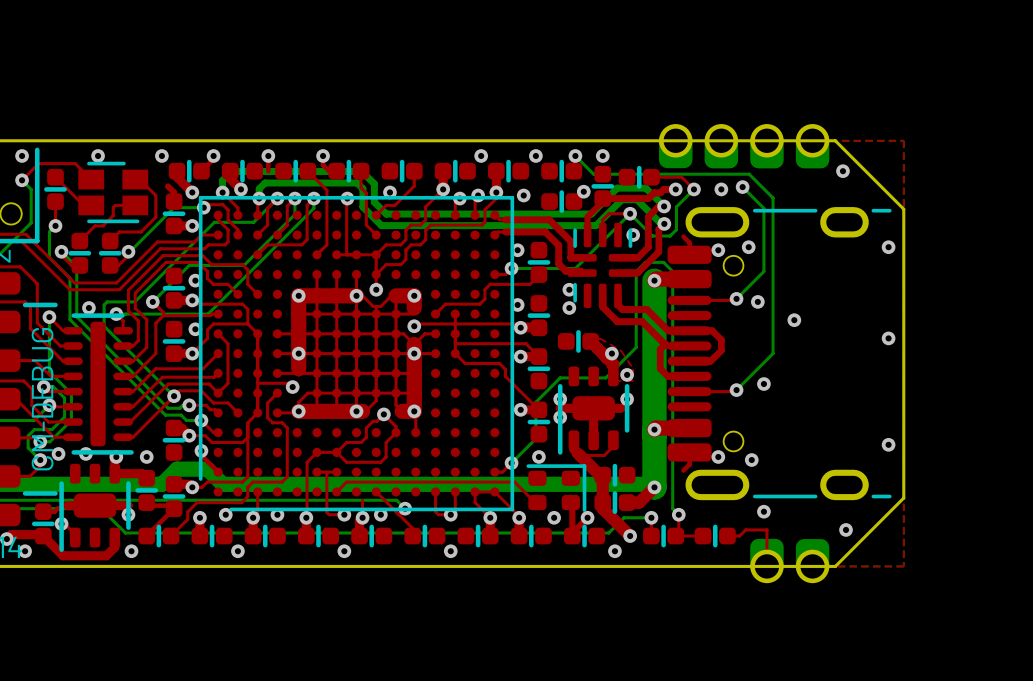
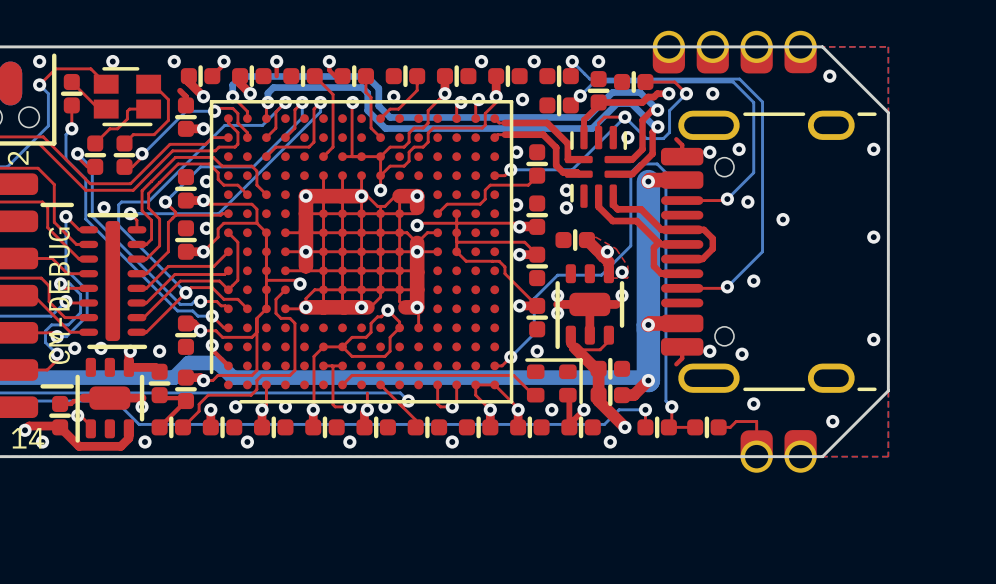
part side: bottom (744, 146) -> top (734, 52)
bottom track: (742, 187) (763, 208) -> (580, 95) (594, 81) (733, 81) (753, 102) (753, 111)
via: (742, 187) -> none
part side: bottom (789, 560) -> top (778, 451)

